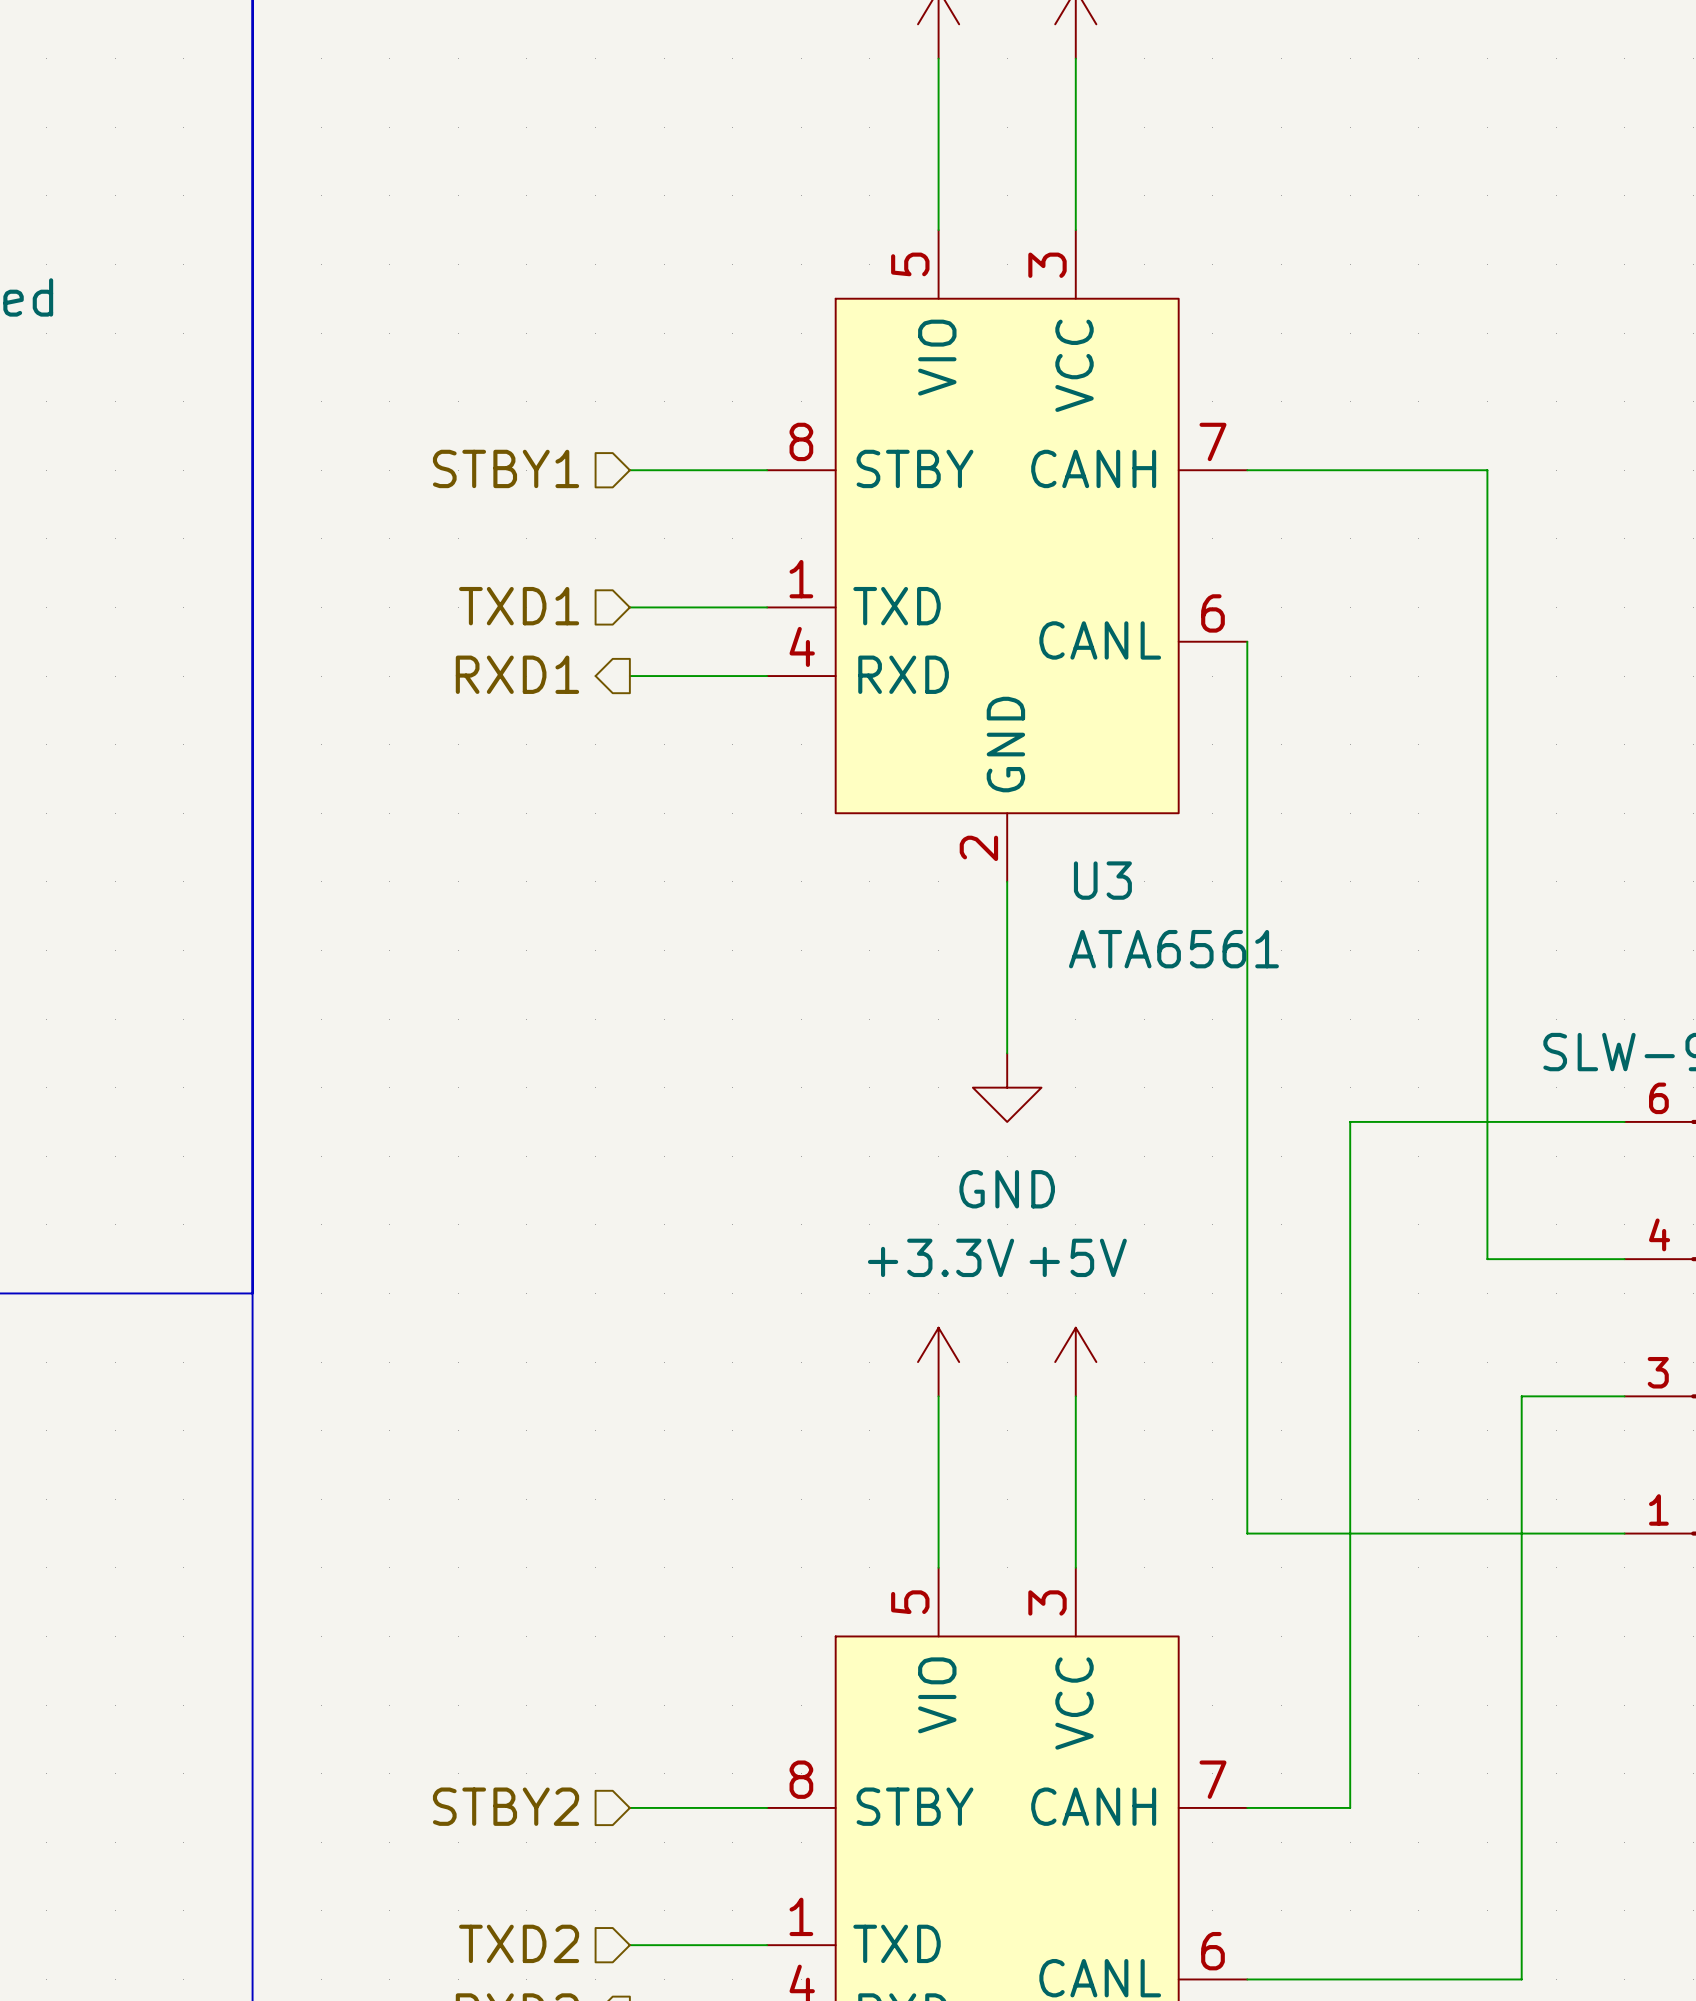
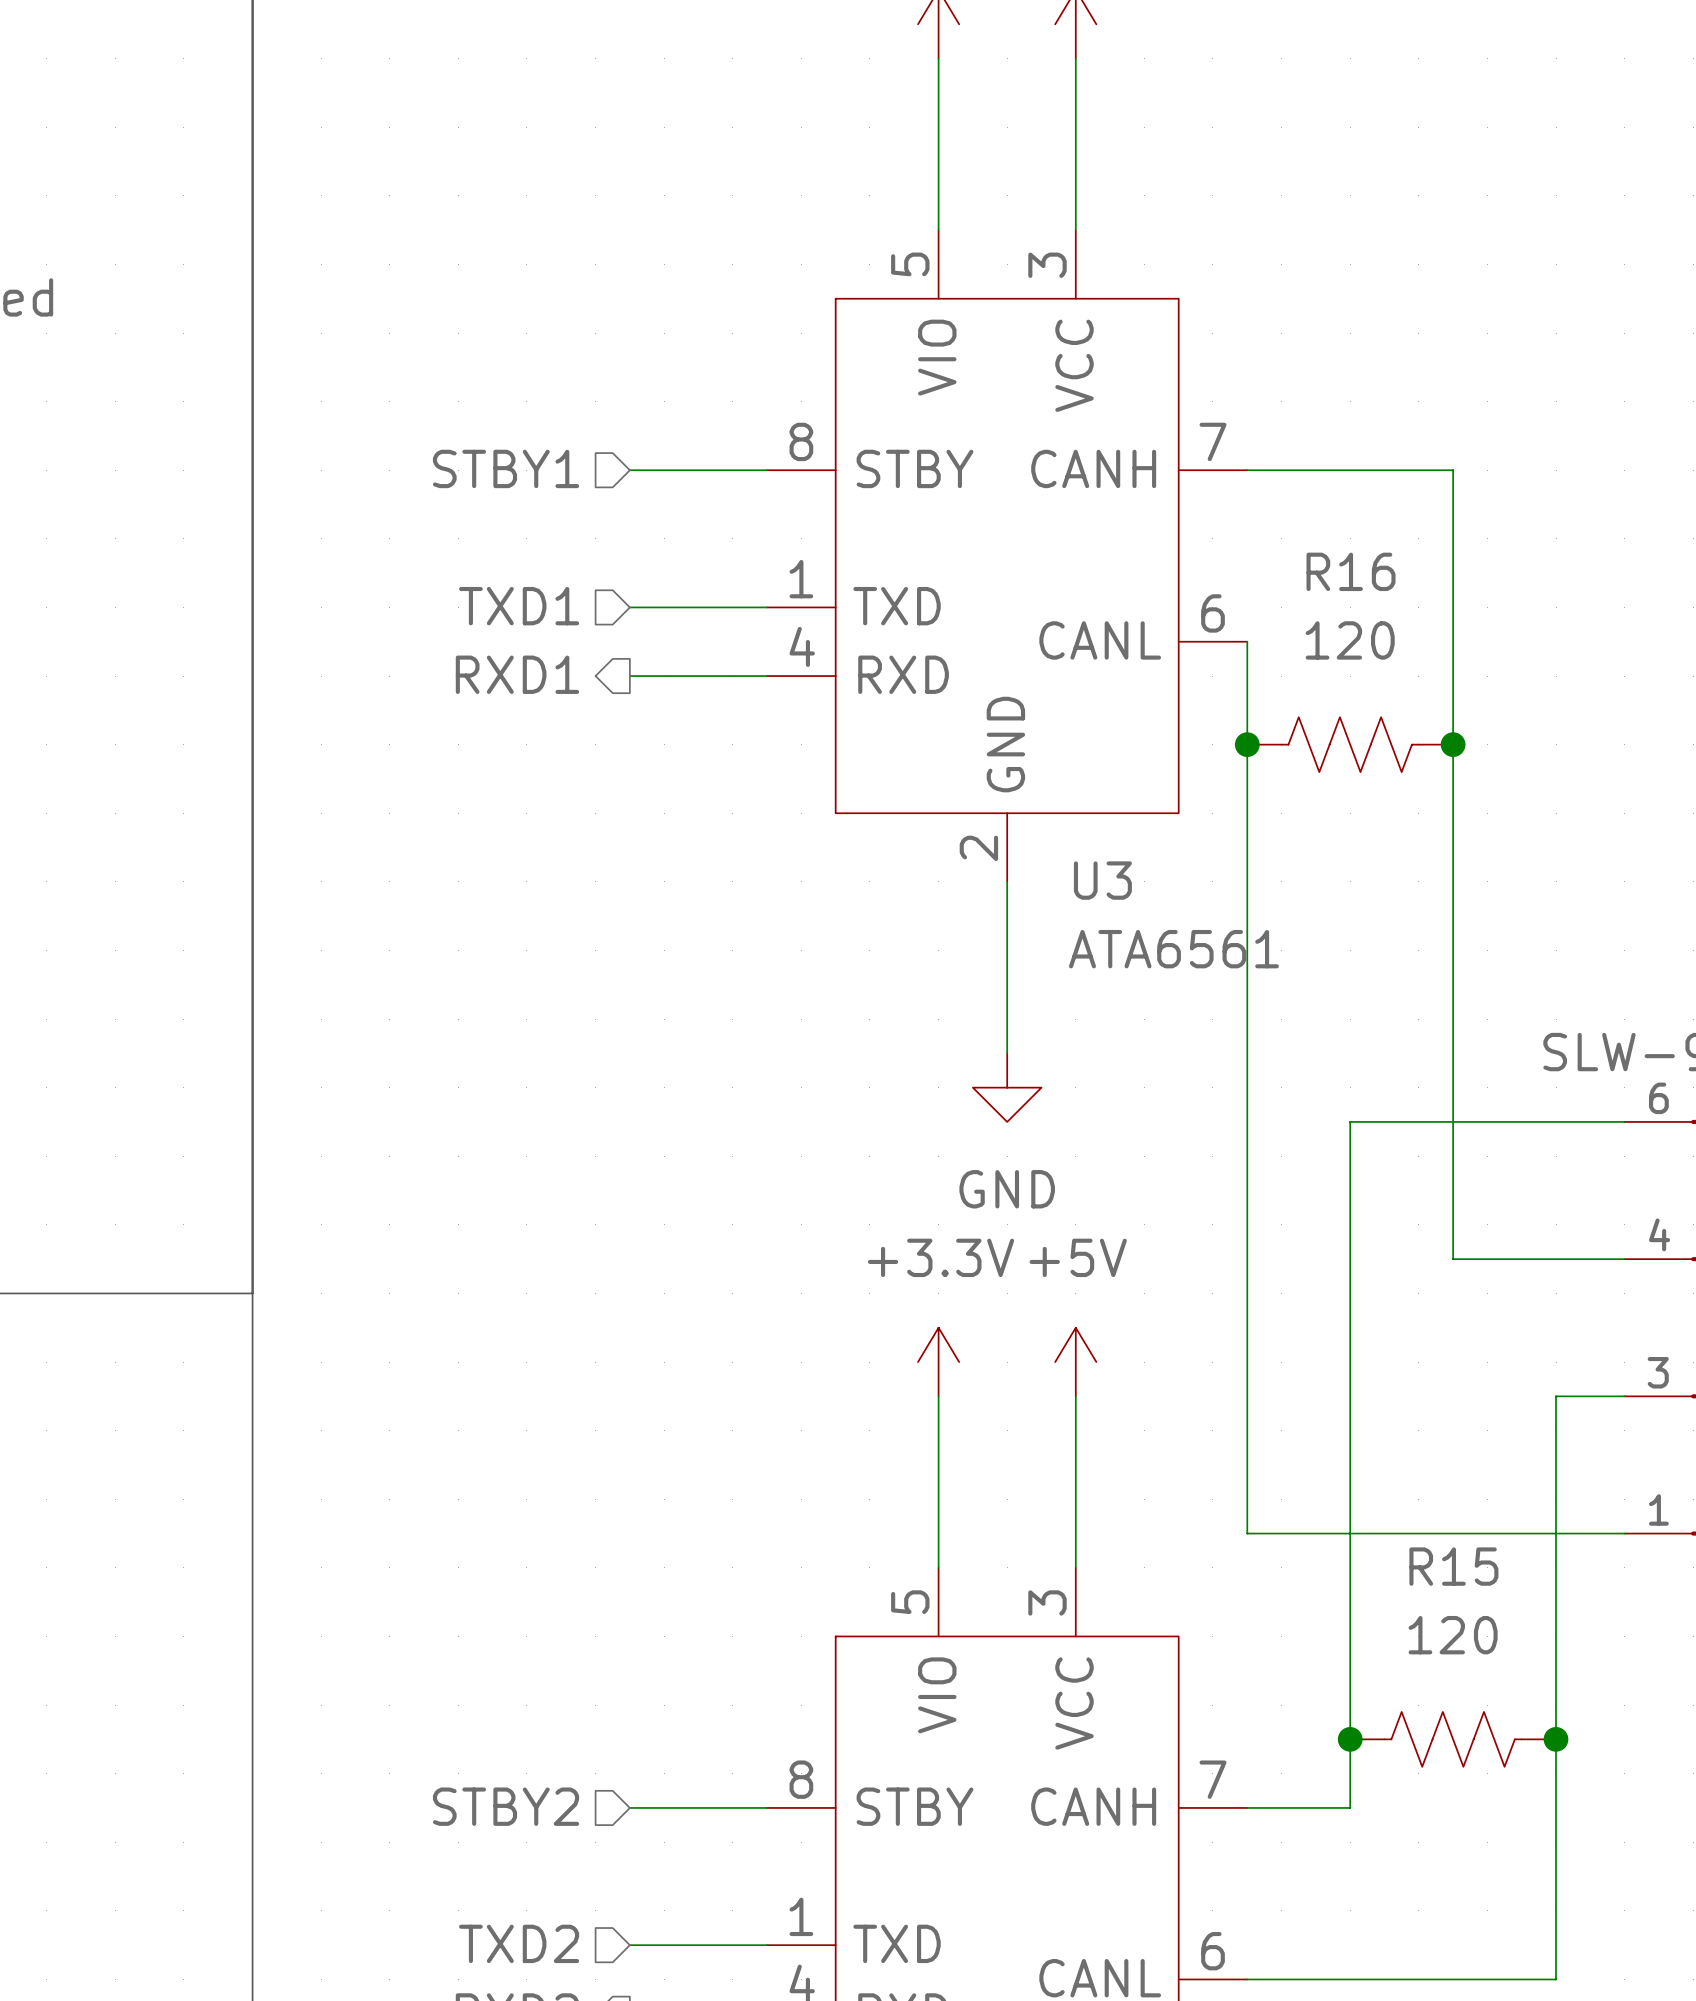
wire: (1453, 470) (1487, 470) (1487, 1259) -> (1453, 470) (1453, 1259) (1487, 1259)
junction: none -> (1247, 744)
R16: none -> 120 (1350, 744)
junction: none -> (1453, 744)
wire: (1556, 1396) (1521, 1396) (1521, 1979) -> (1556, 1396) (1556, 1979) (1521, 1979)
junction: none -> (1350, 1739)
R15: none -> 120 (1453, 1739)
junction: none -> (1556, 1739)

